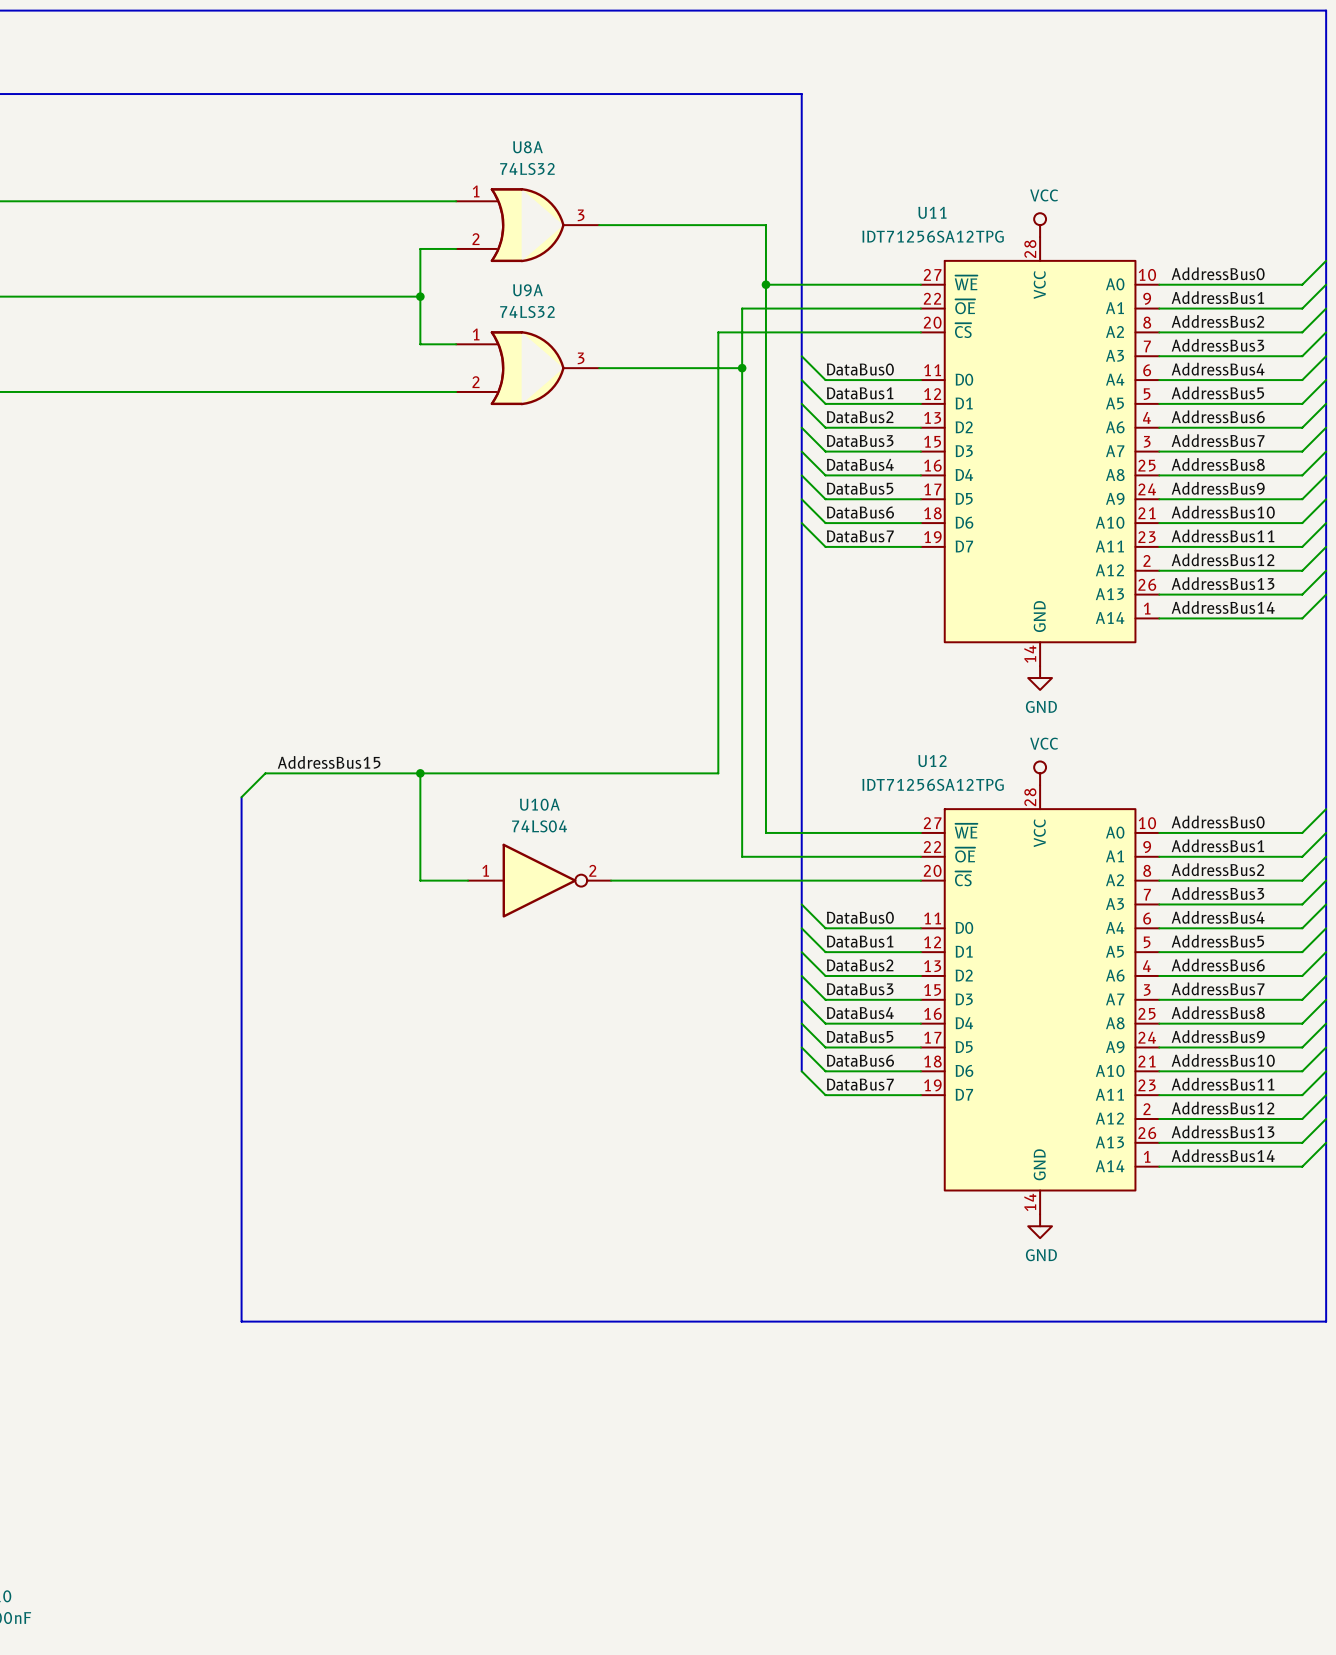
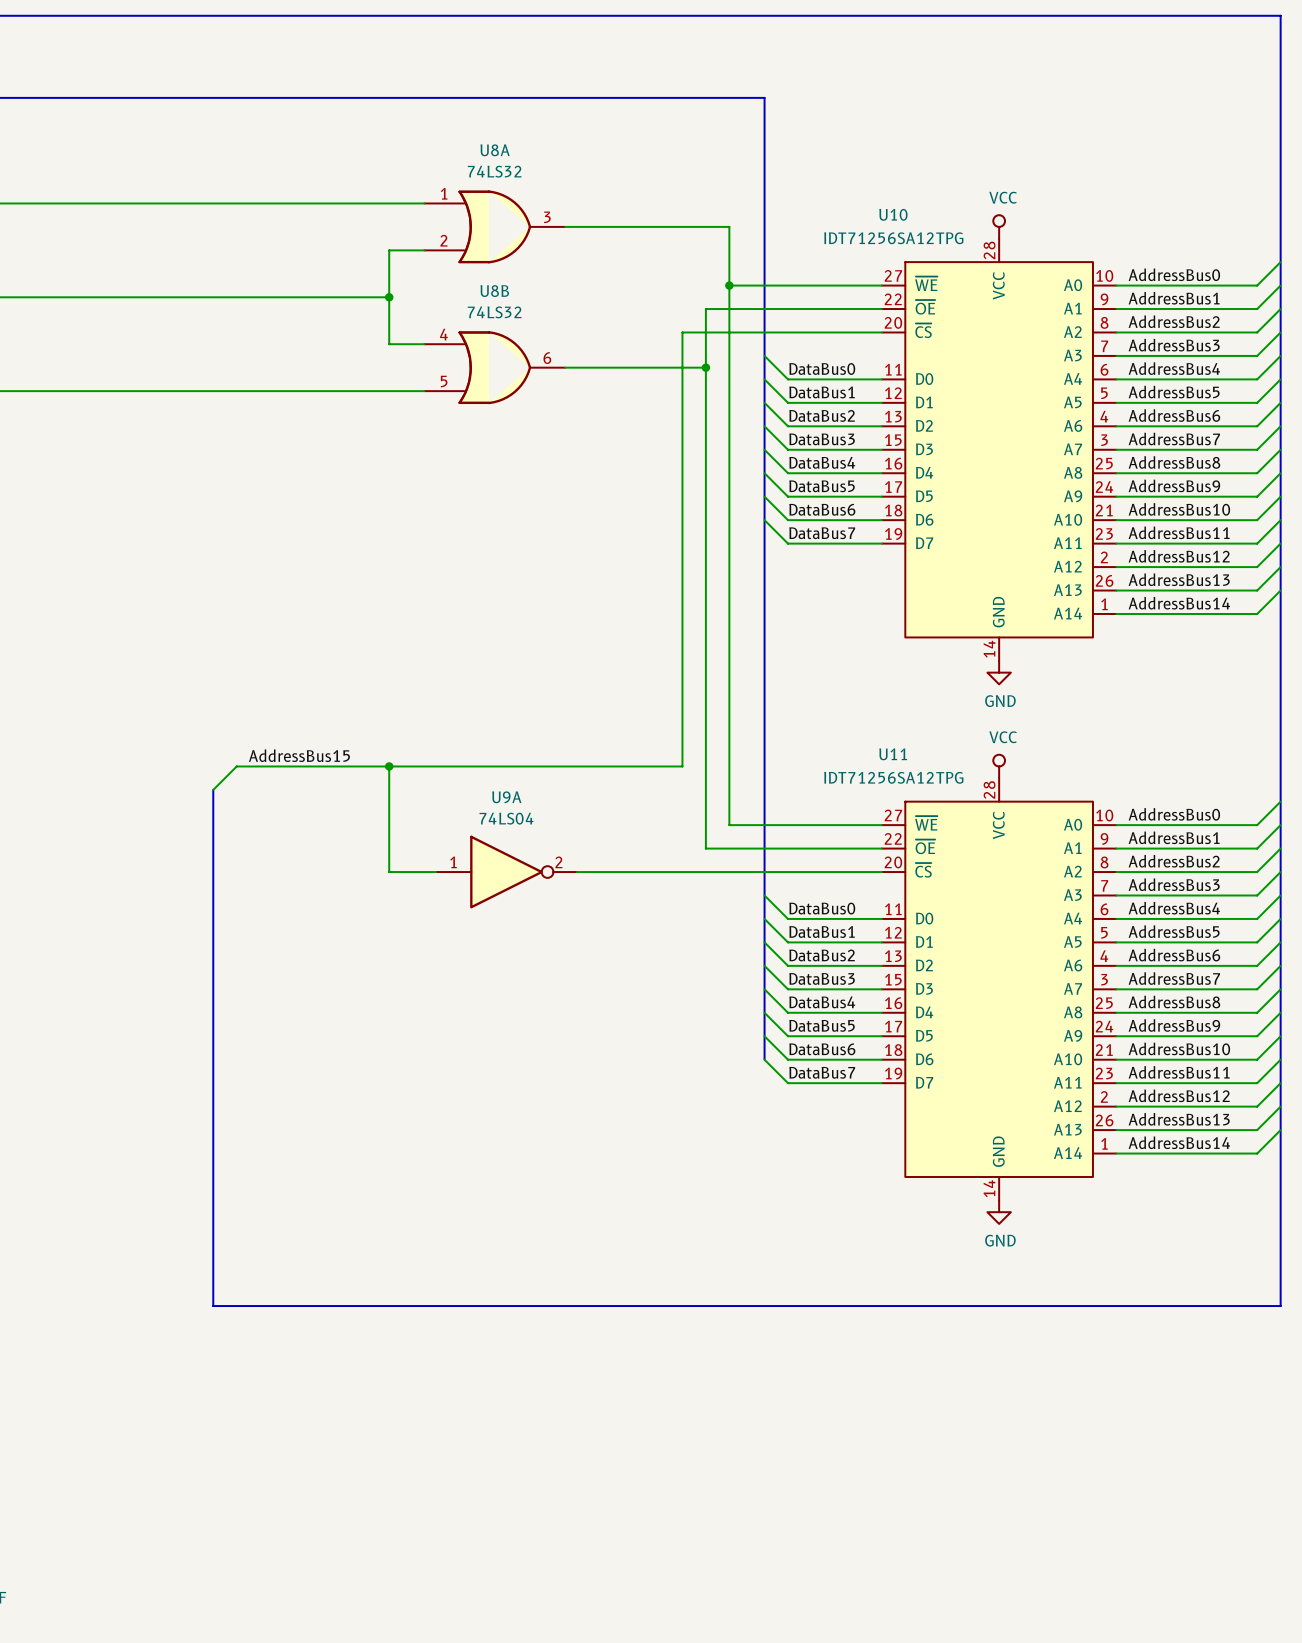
U11 name: U11 (932, 212) -> U10 (893, 214)
U9A name: U9A (527, 290) -> U8B (494, 291)
U9A pin number: 1 (476, 334) -> 4 (443, 334)
U9A pin number: 3 (581, 358) -> 6 (547, 358)
U9A pin number: 2 (476, 382) -> 5 (444, 381)
U12 name: U12 (932, 761) -> U11 (893, 754)
U10A name: U10A (539, 804) -> U9A (506, 797)

